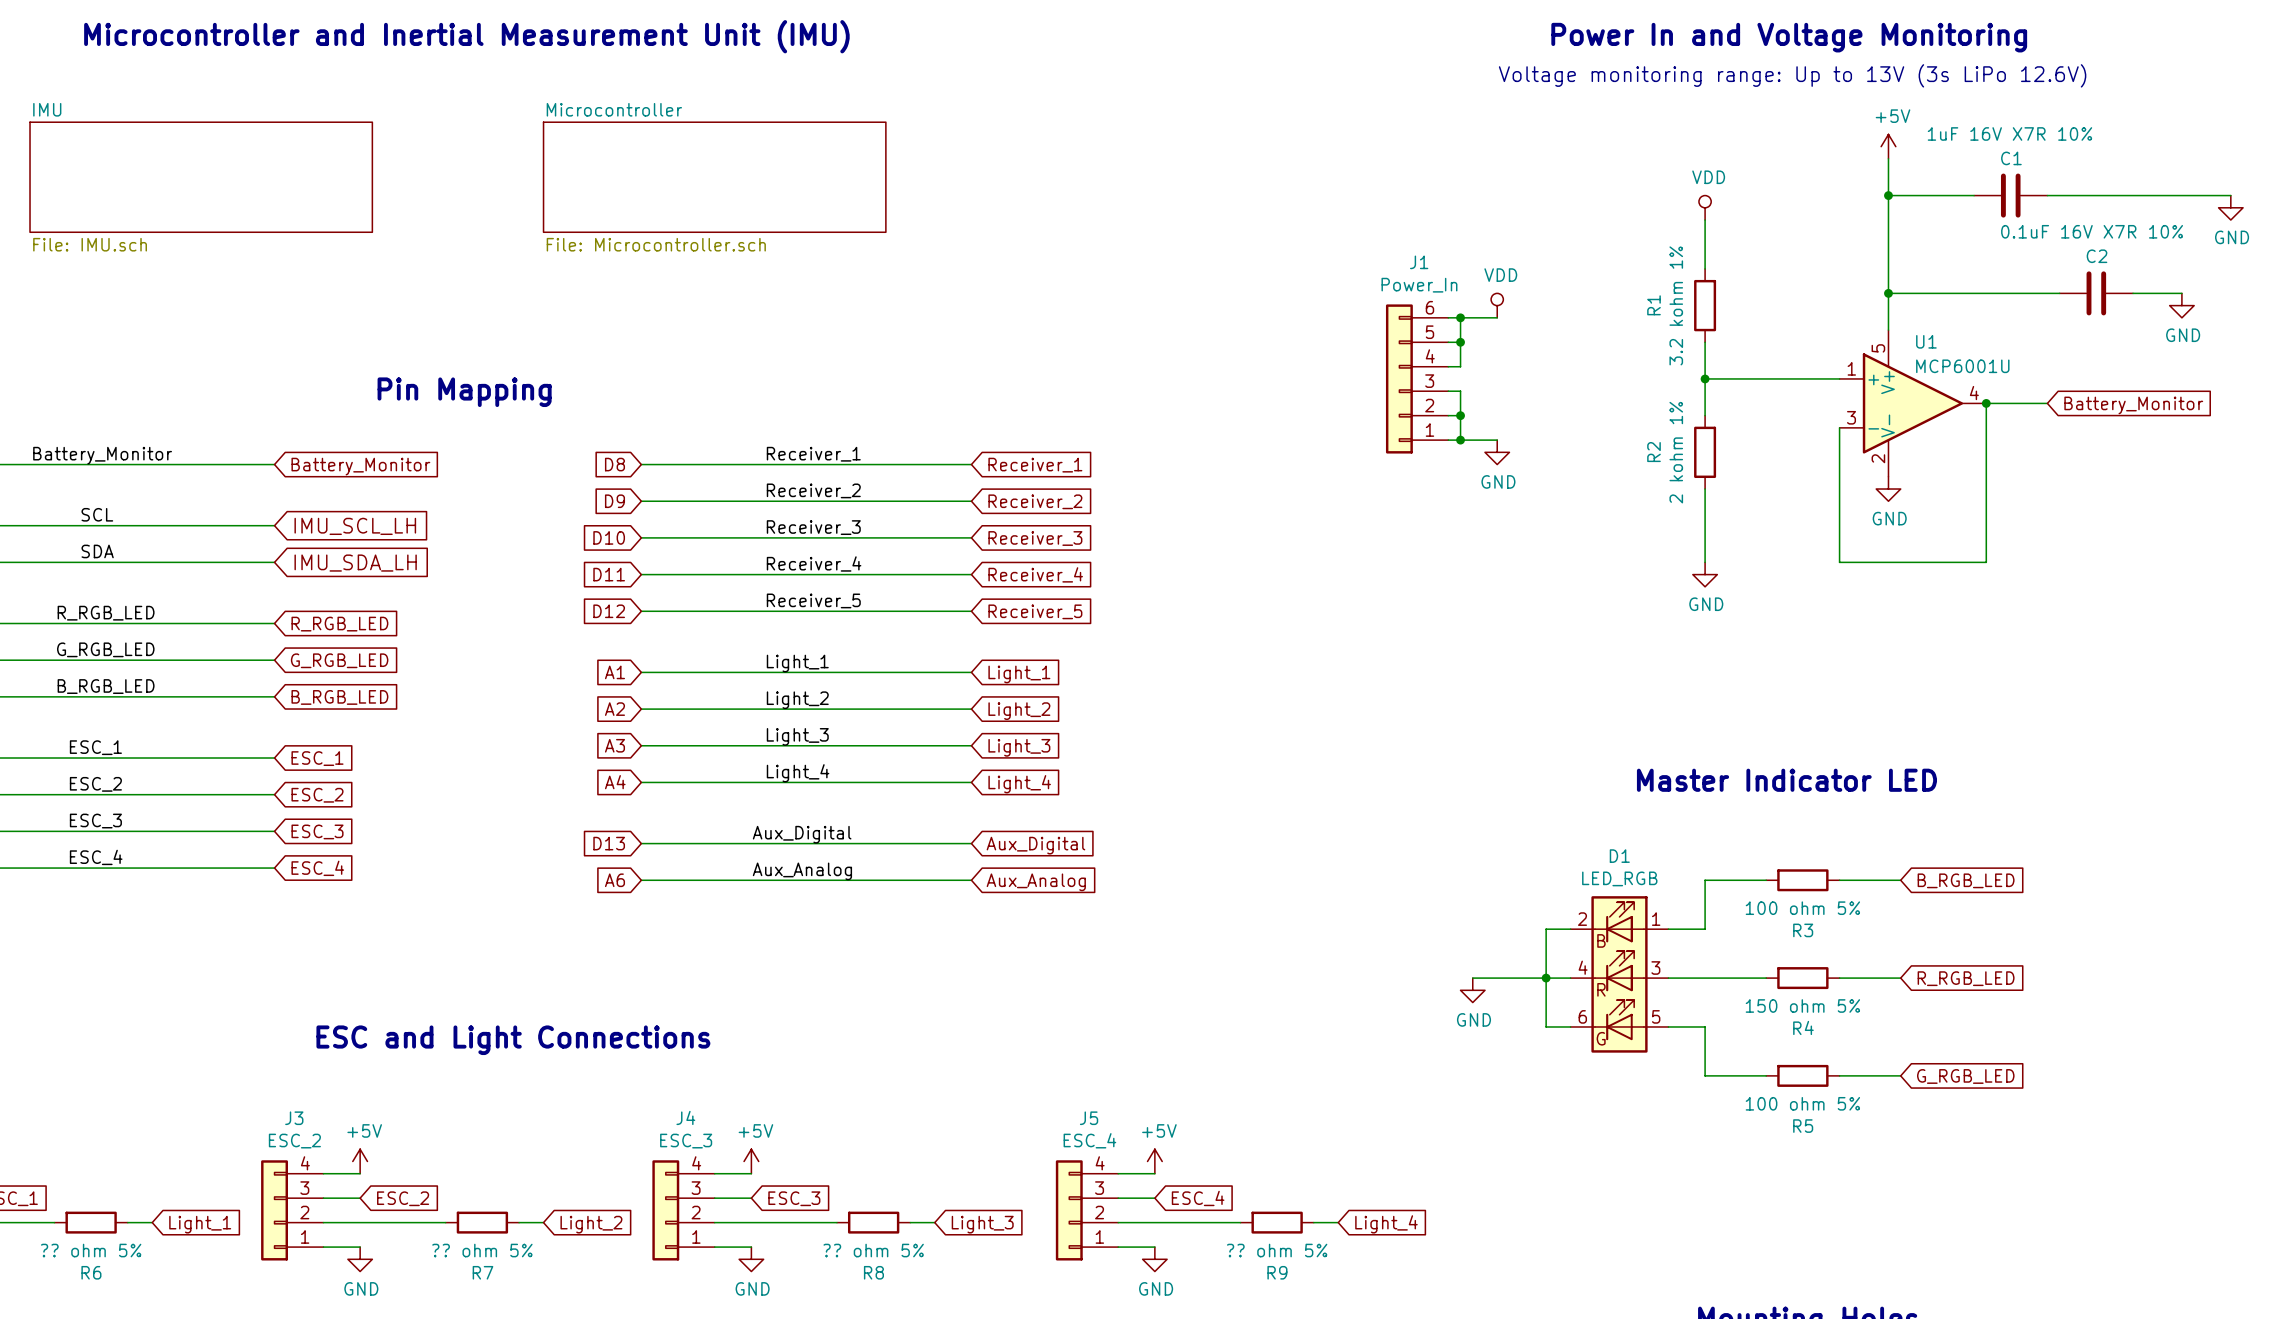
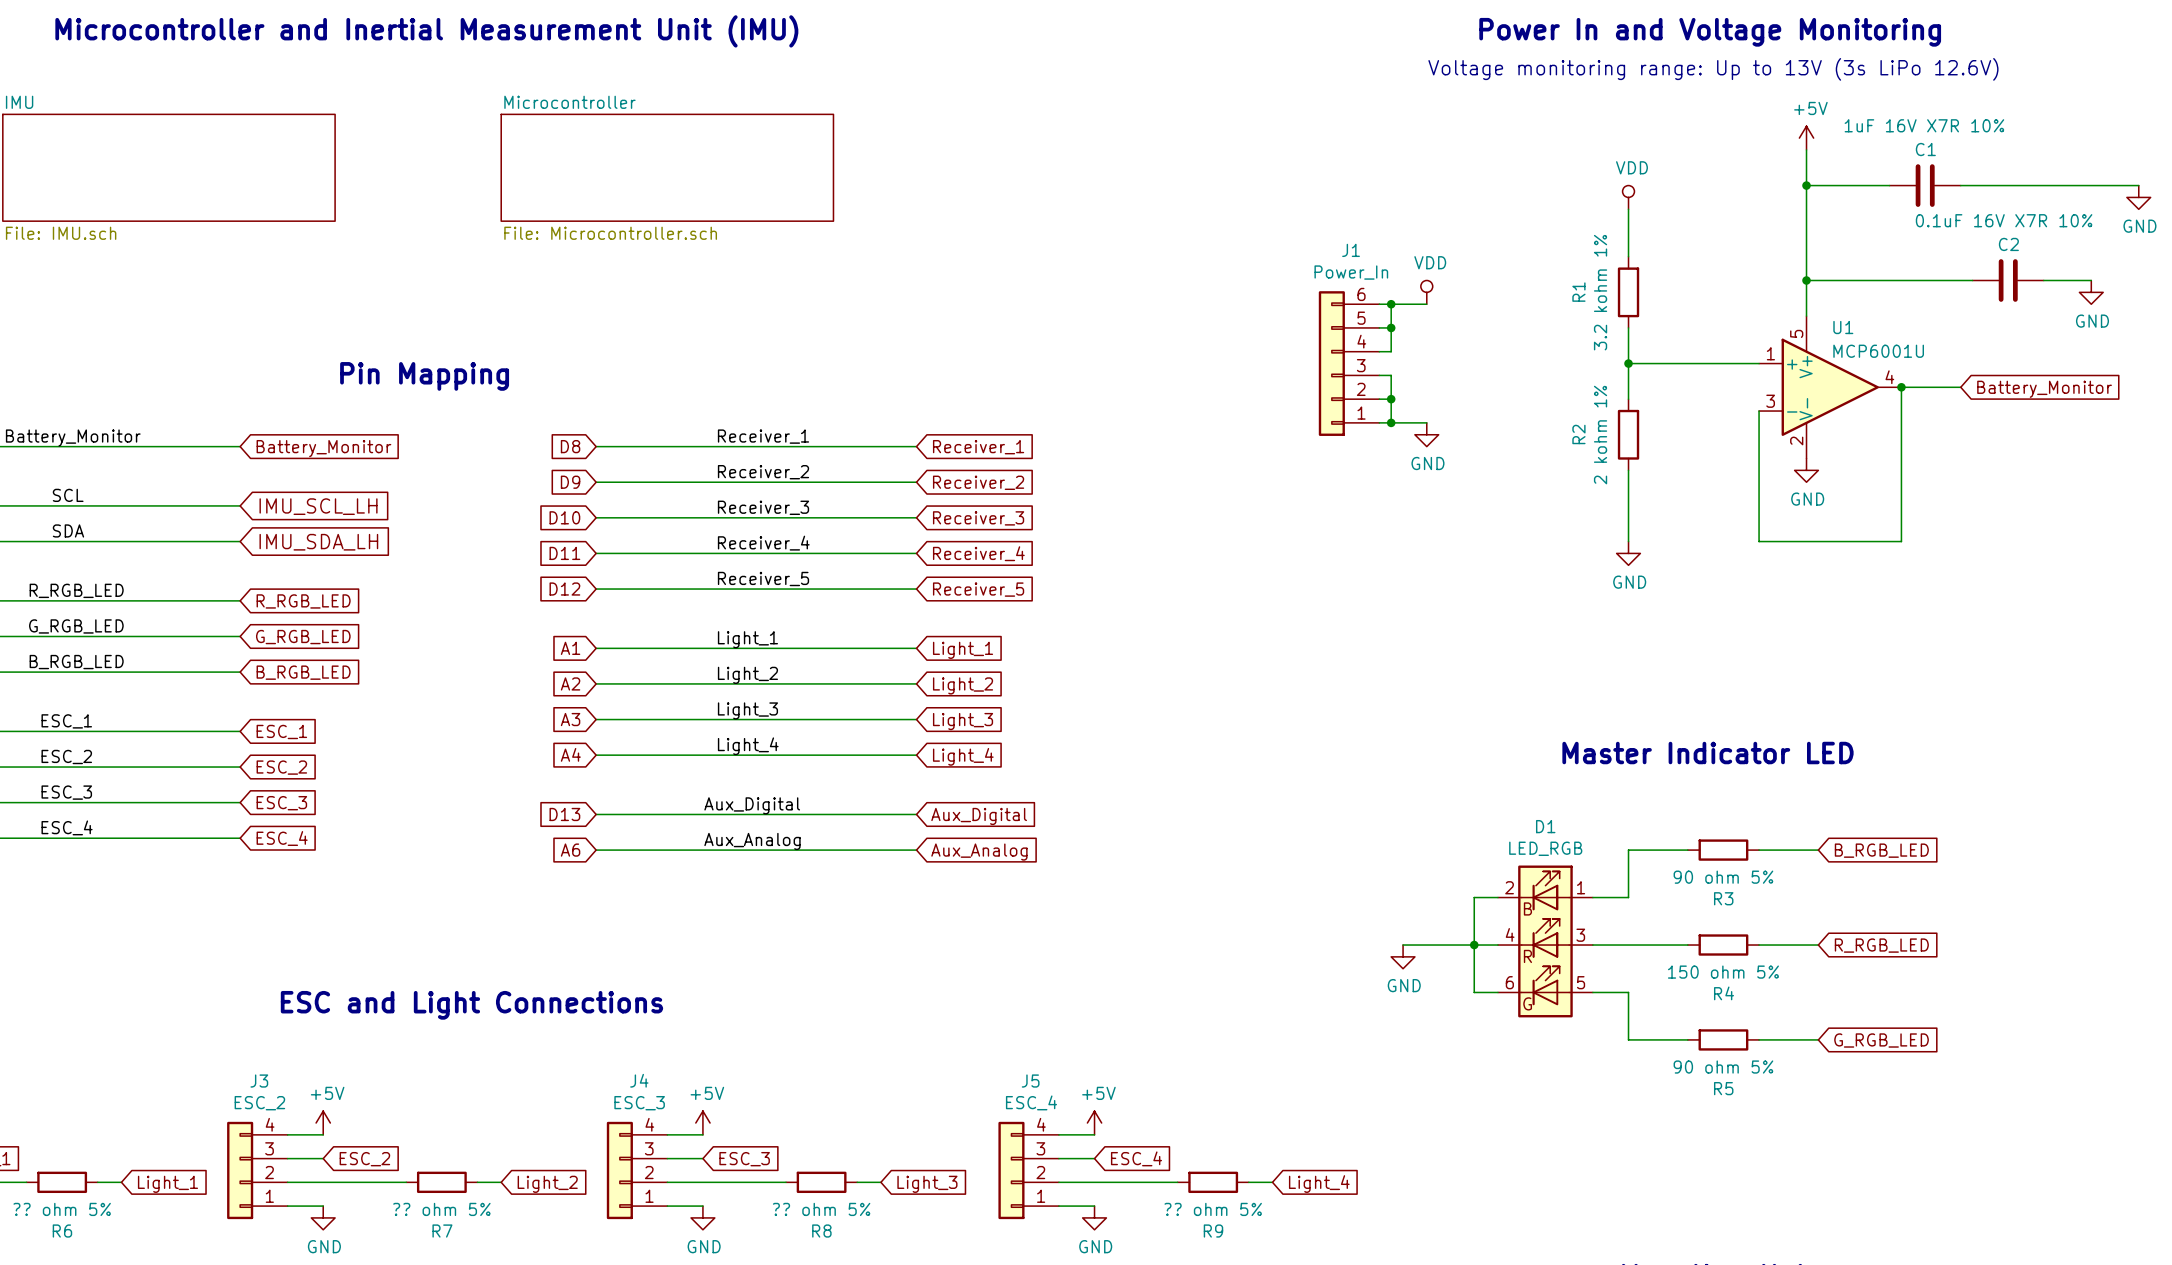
R3 value: 100 ohm 5% (1802, 908) -> 90 ohm 5% (1723, 877)
R5 value: 100 ohm 5% (1802, 1103) -> 90 ohm 5% (1723, 1067)

